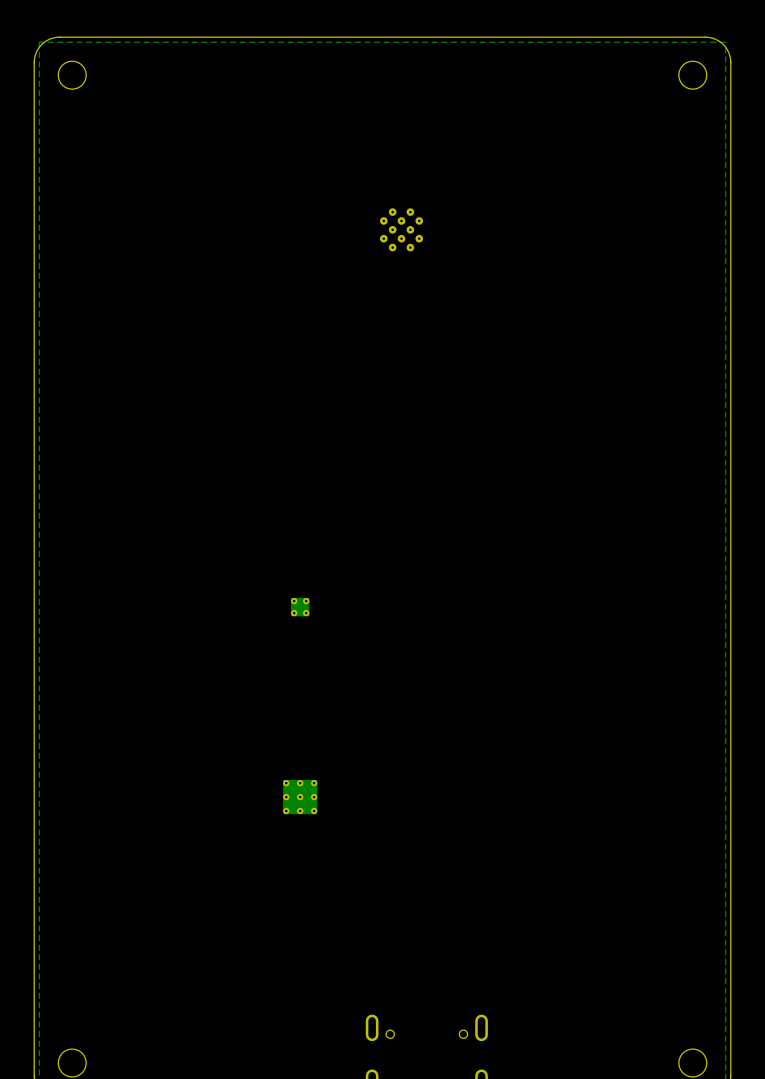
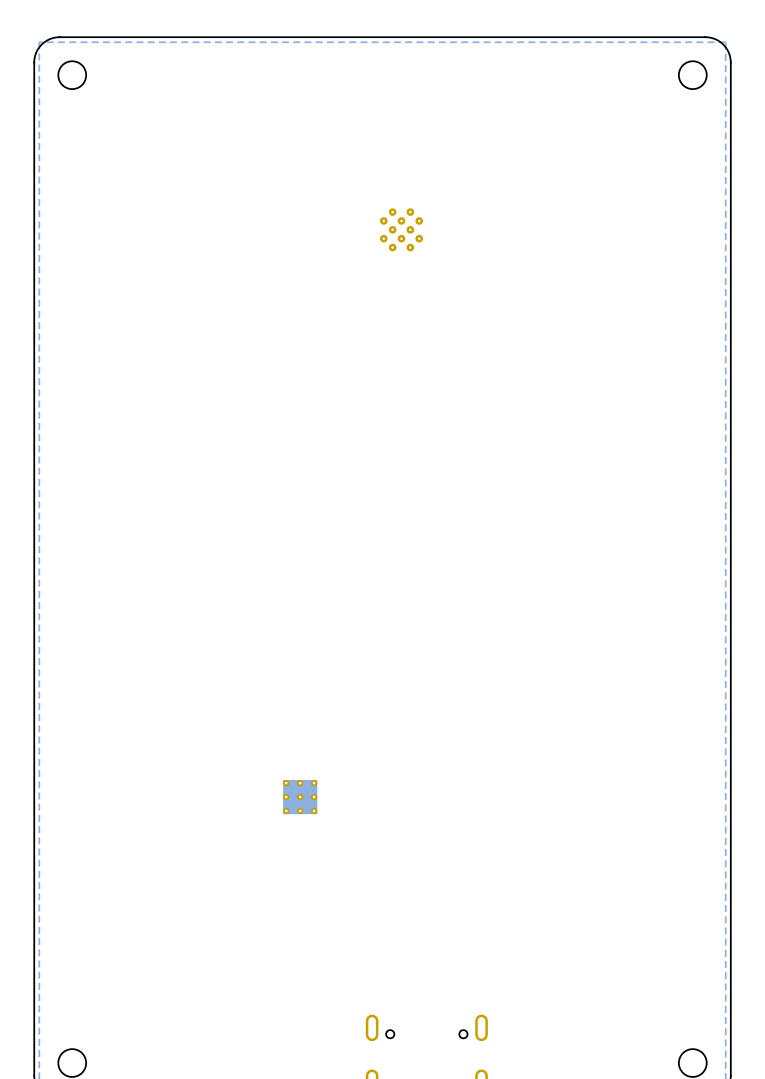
part: (300, 607) -> none

